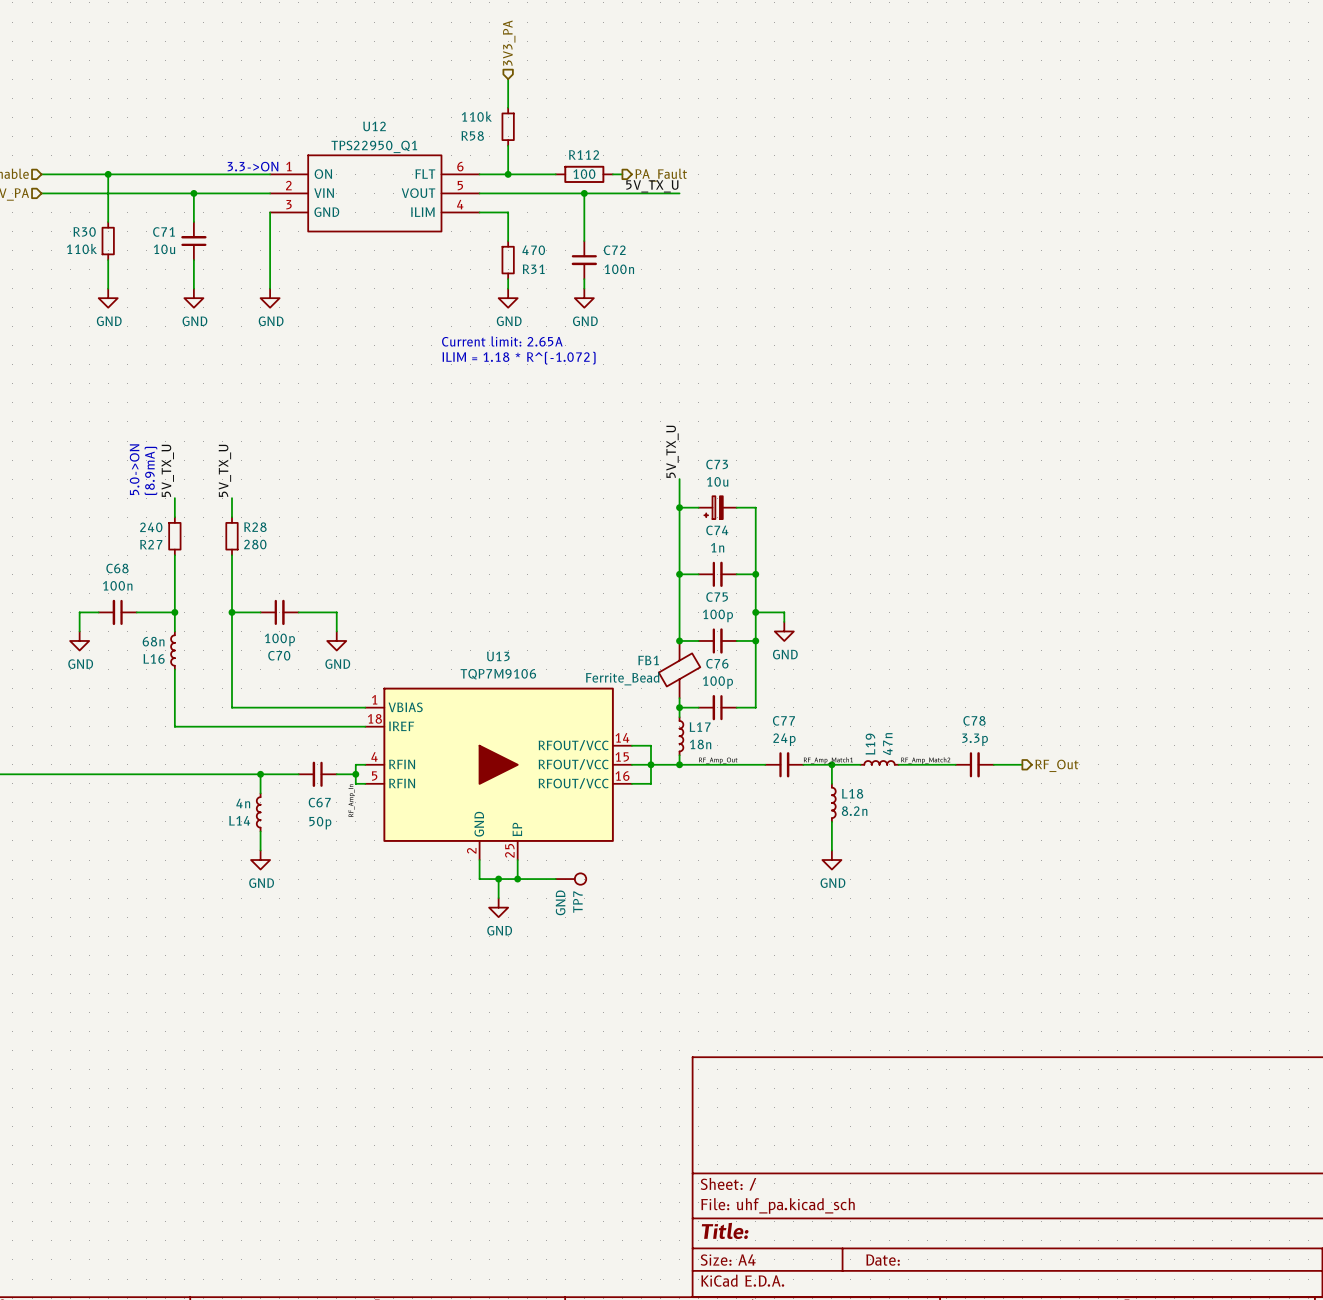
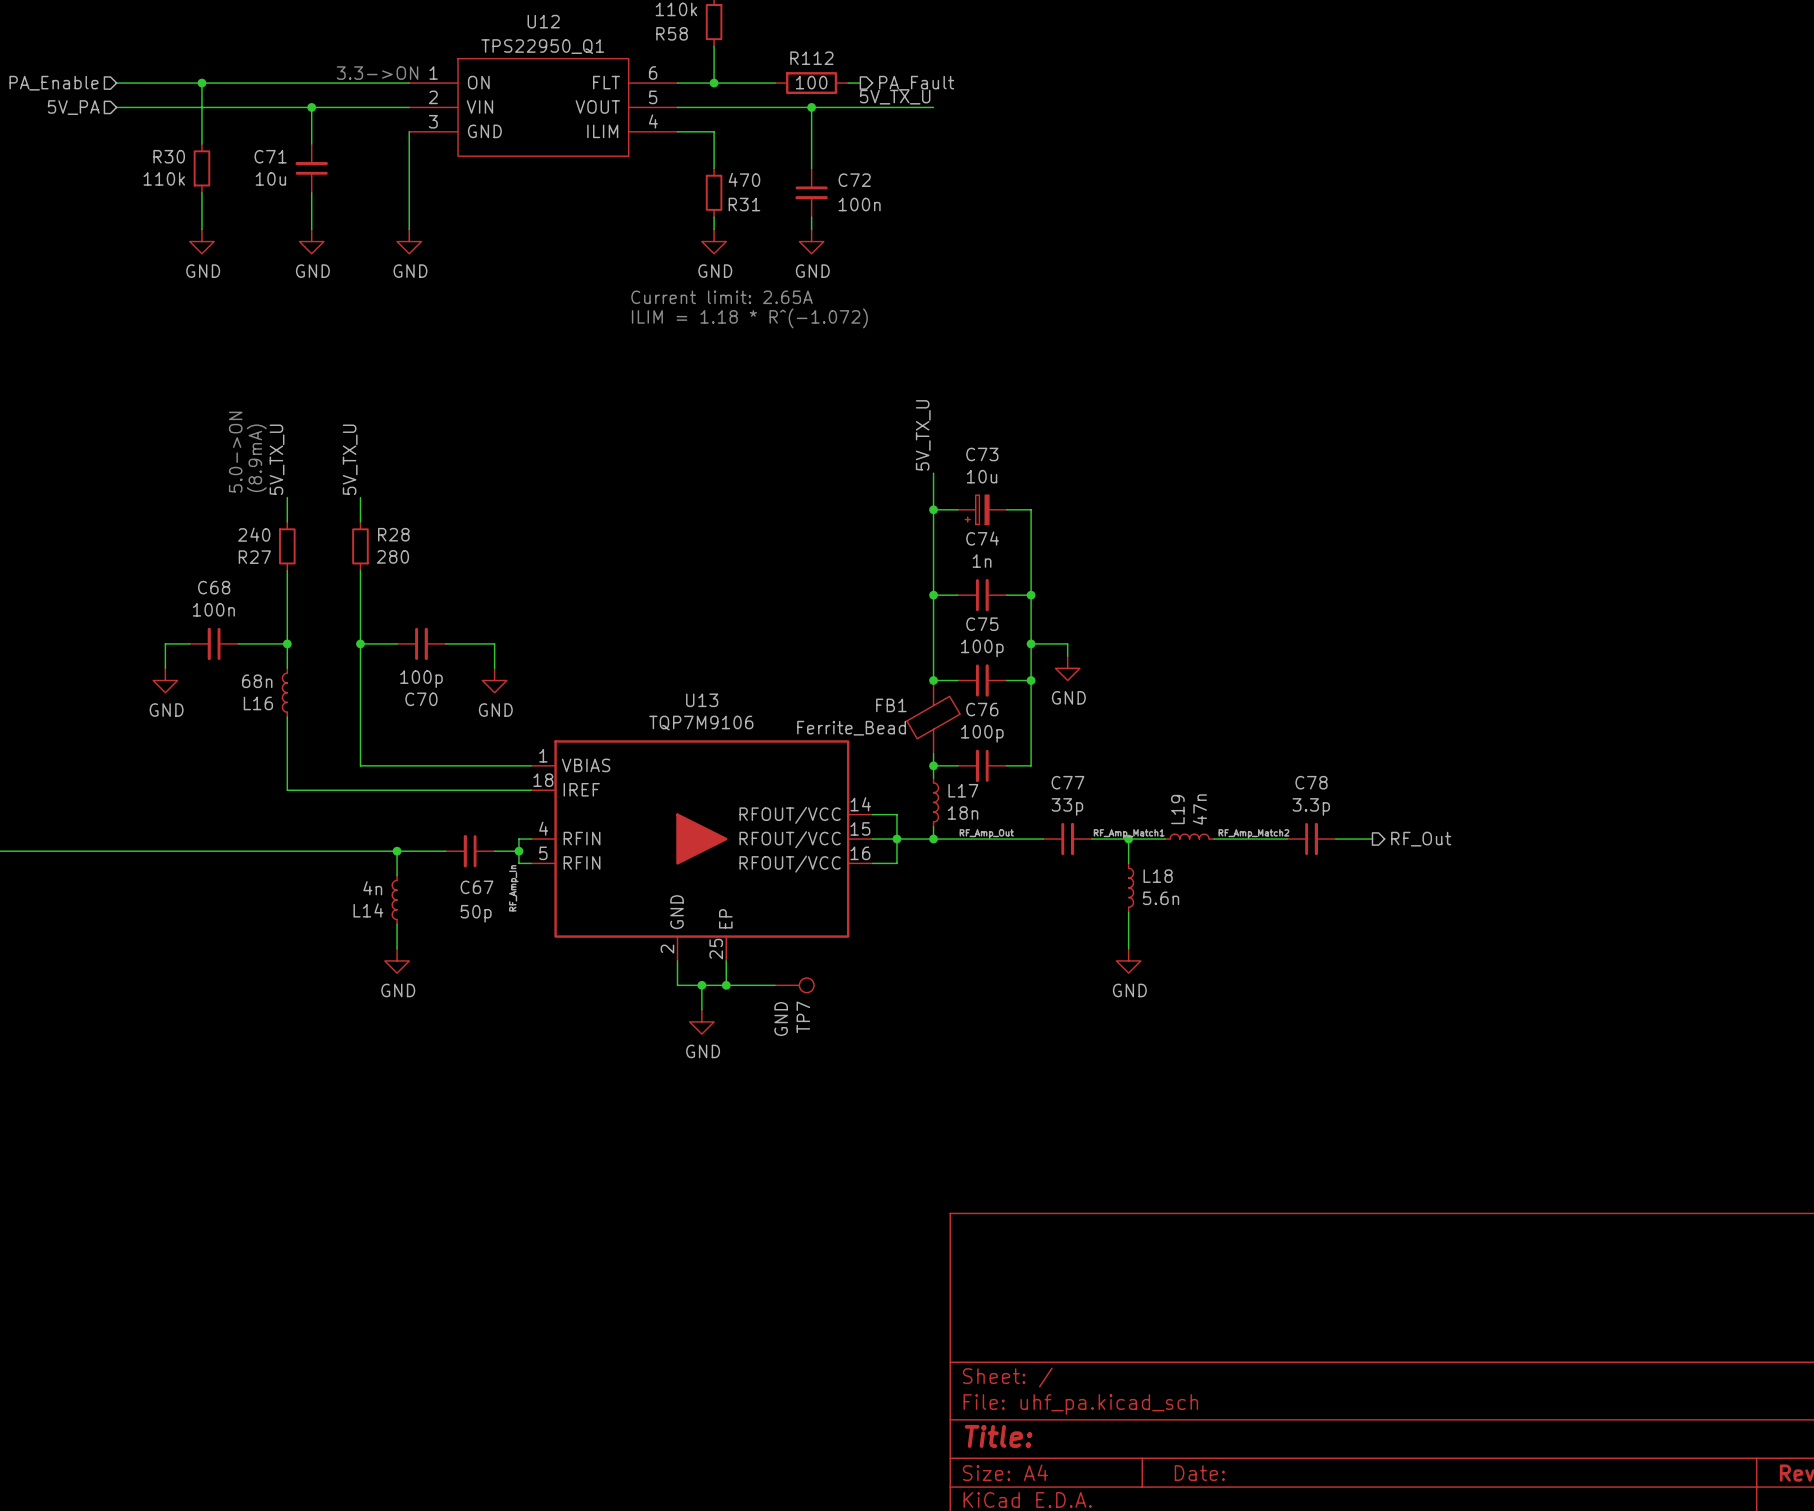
C77 value: 24p (784, 739) -> 33p (1067, 806)
L18 value: 8.2n (854, 811) -> 5.6n (1161, 898)

